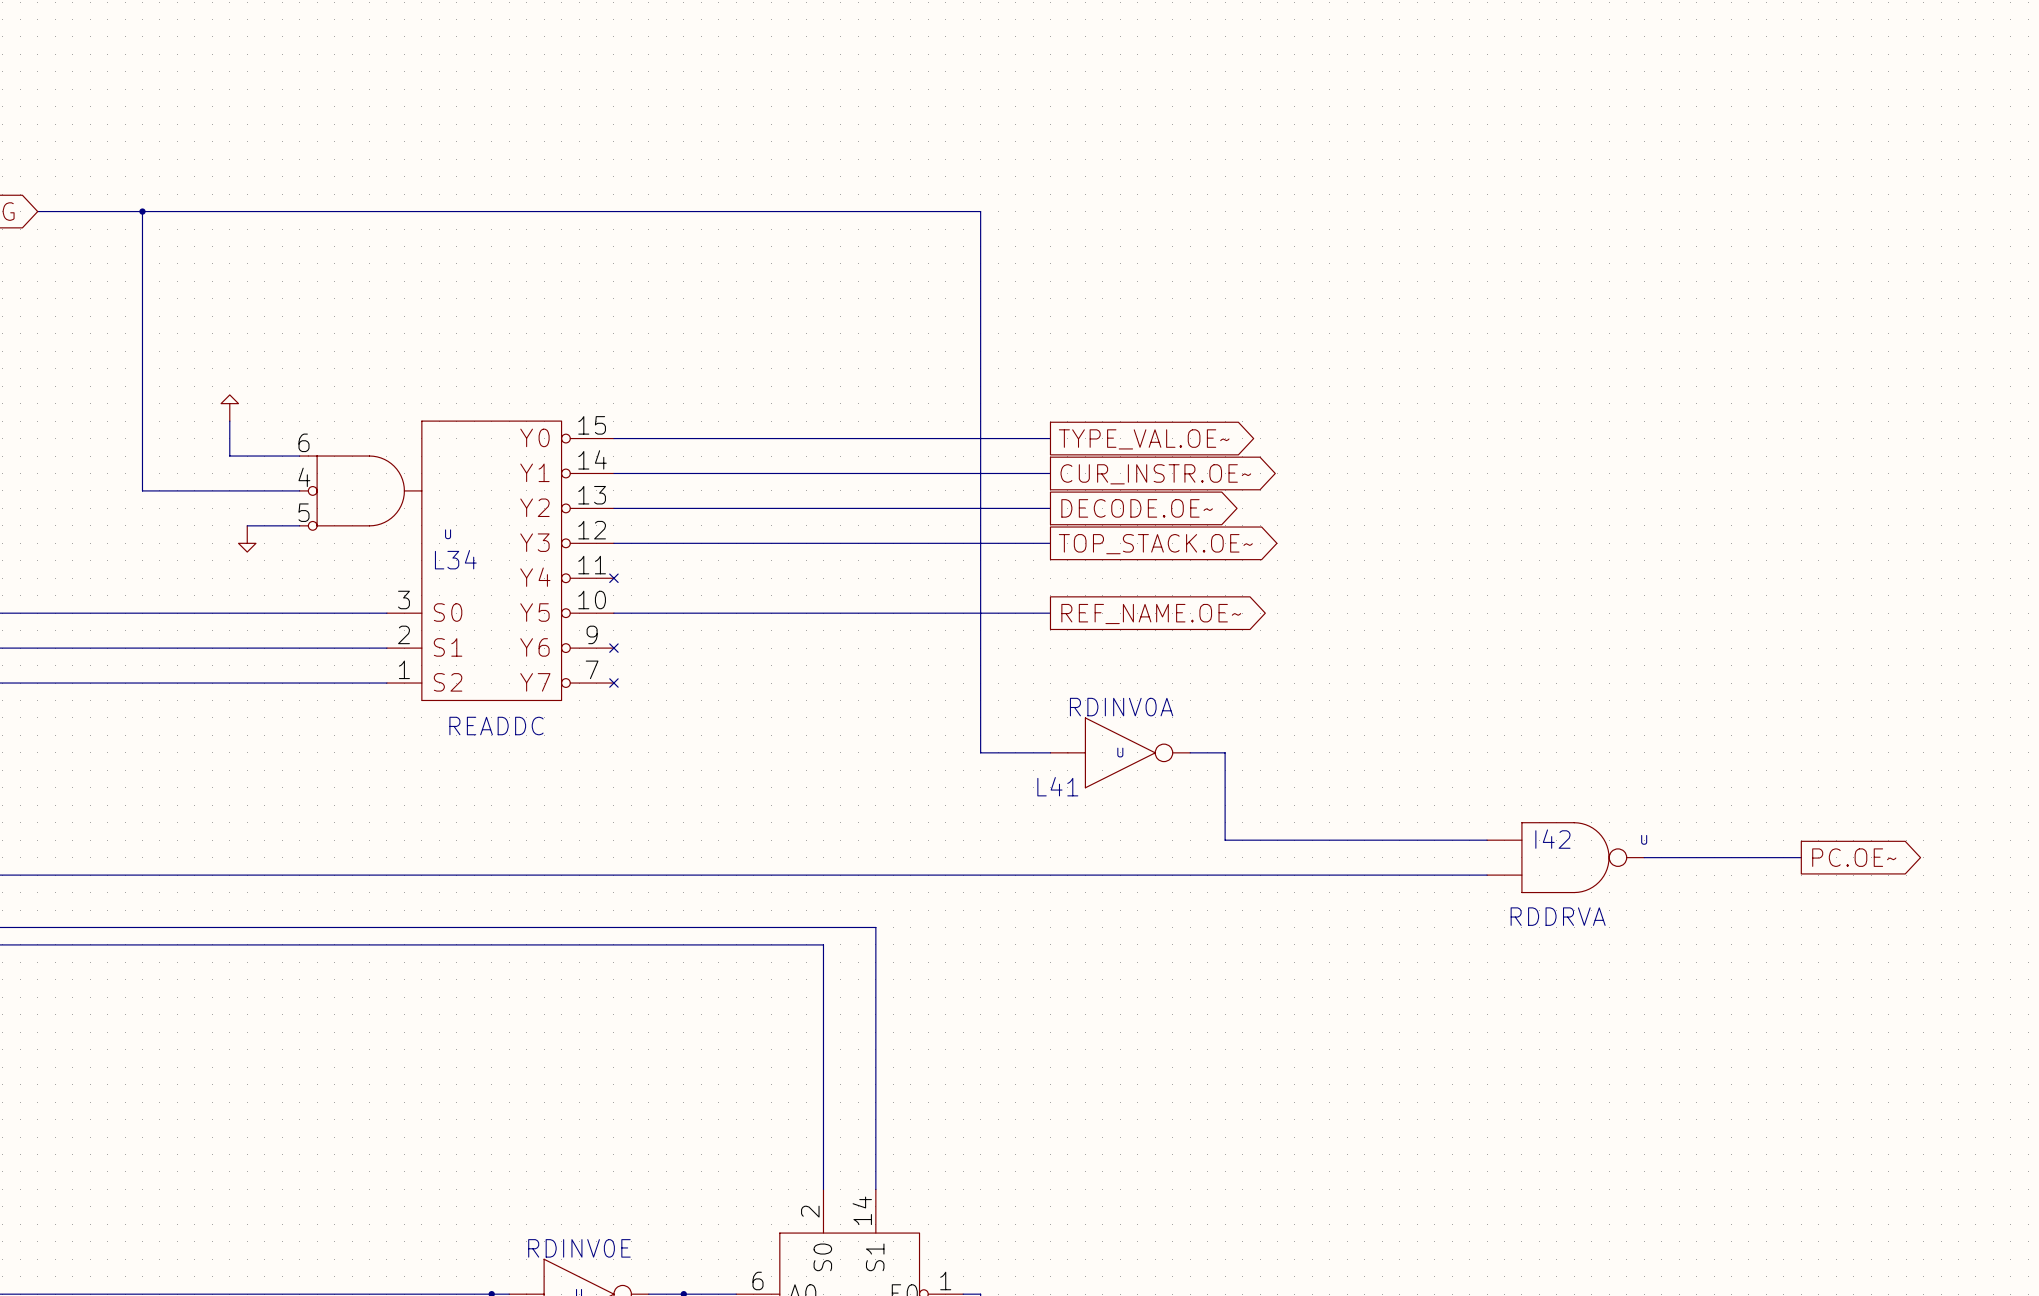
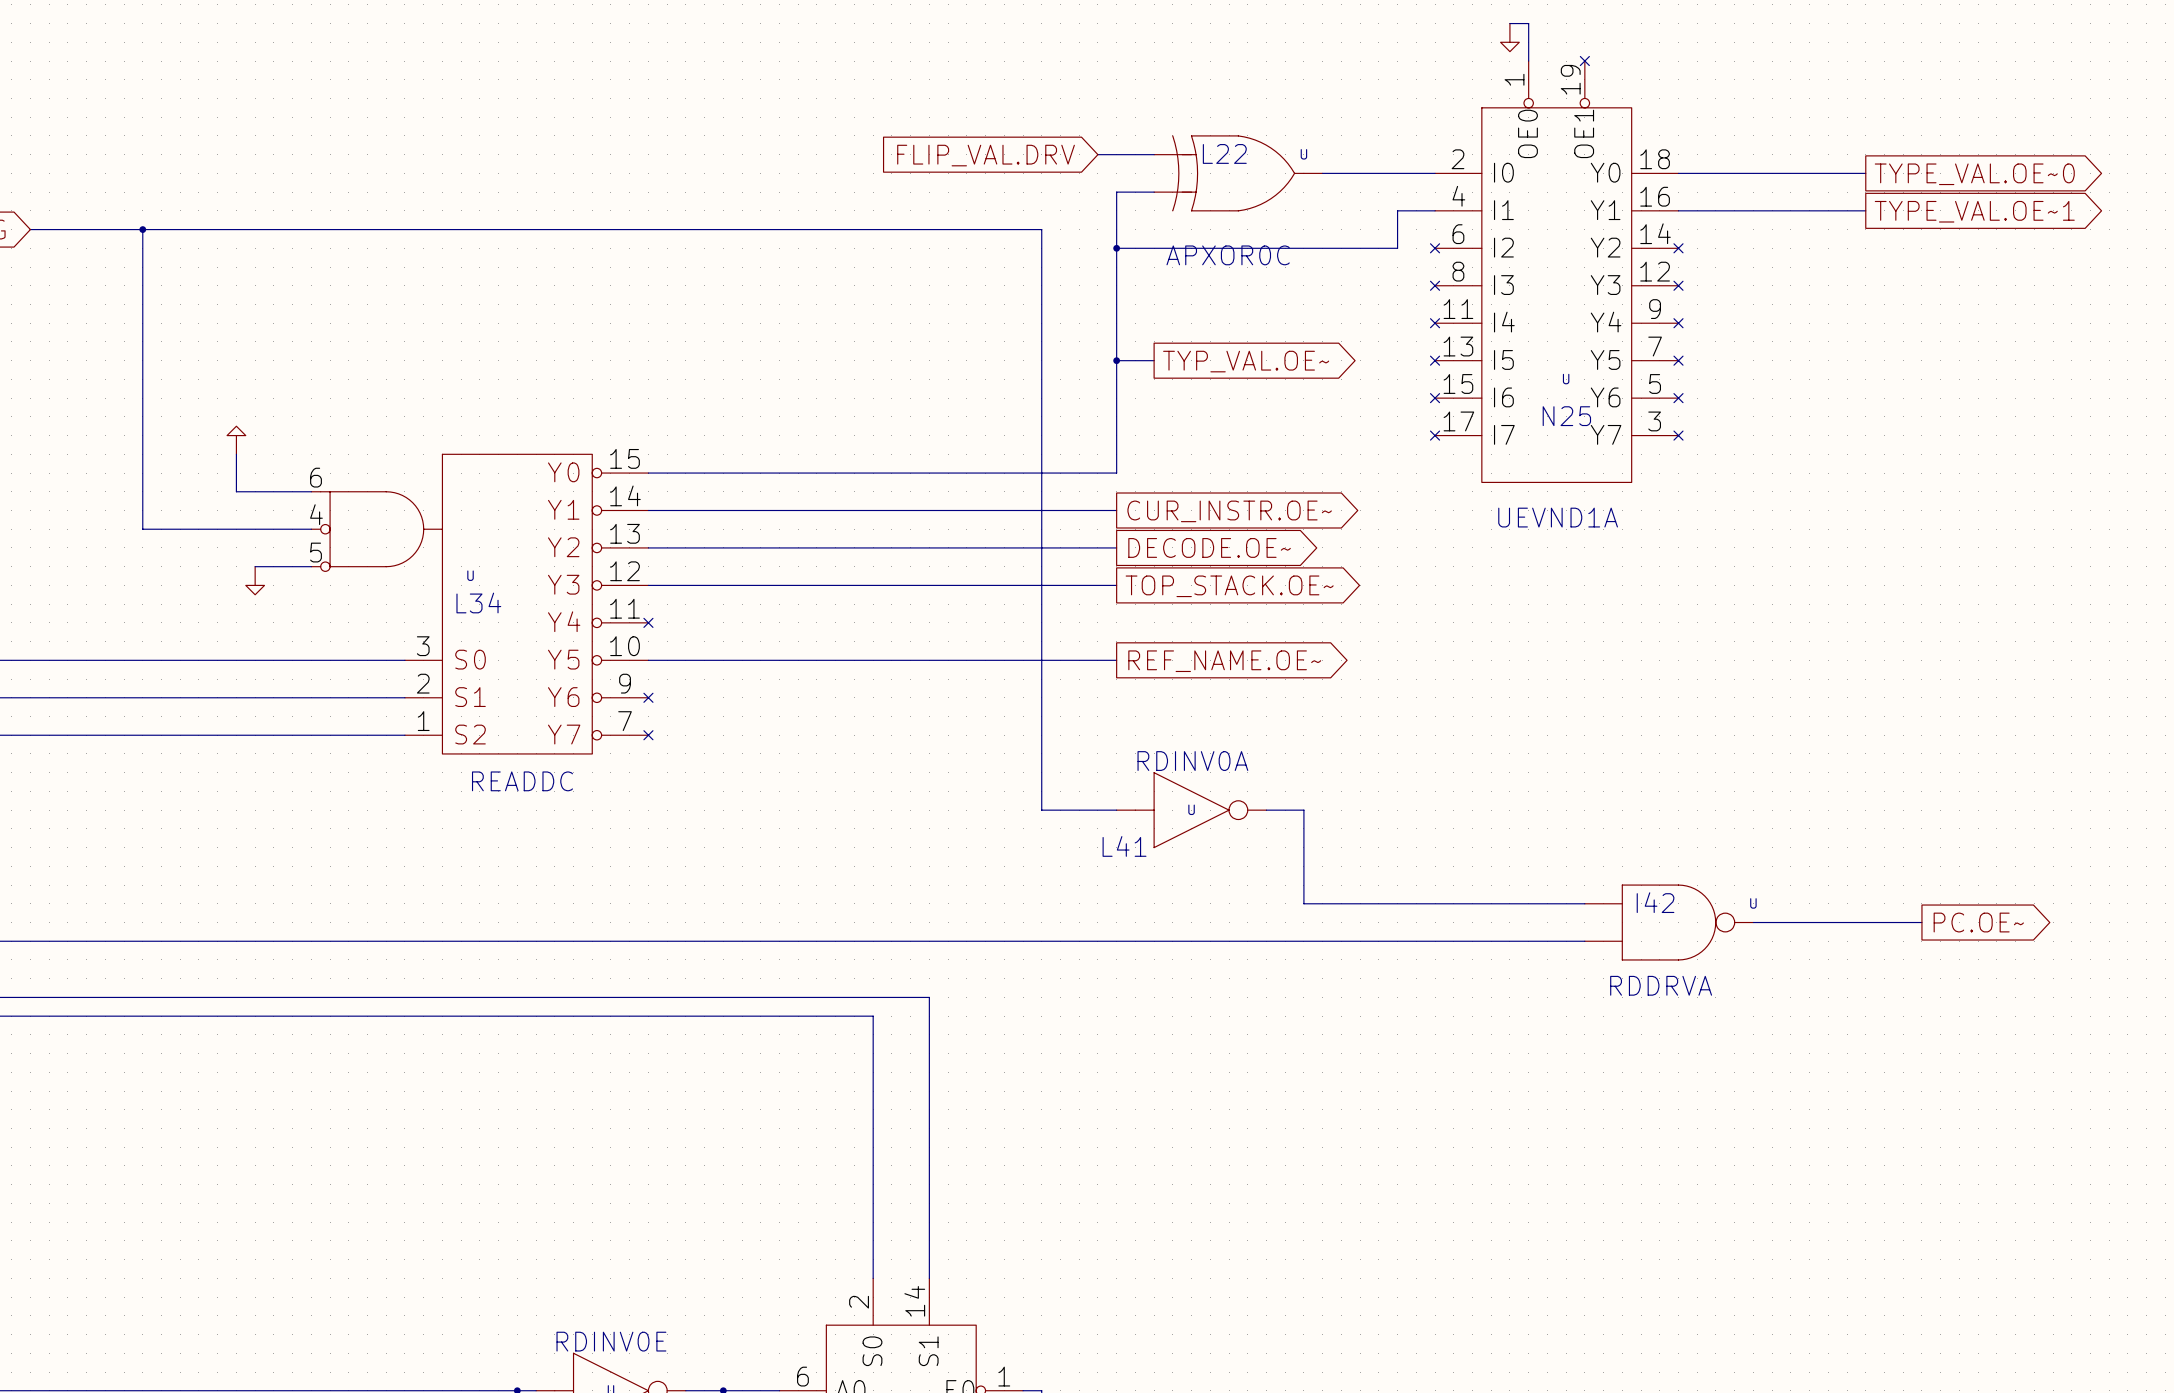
wire: none -> (1509, 23) (1528, 23) (1528, 61)
power symbol: none -> (1509, 37)
no-connect mark: none -> (1584, 61)
wire: none -> (1097, 154) (1154, 154)
global label: none -> FLIP_VAL.DRV (986, 155)
U: none -> (1238, 173)
wire: none -> (1322, 173) (1435, 173)
wire: none -> (1678, 173) (1865, 173)
global label: none -> TYPE_VAL.OE~0 (1974, 174)
wire: none -> (1154, 192) (1116, 192) (1116, 473)
wire: none -> (1435, 210) (1397, 210) (1397, 248) (1116, 248)
wire: none -> (1678, 210) (1865, 210)
global label: none -> TYPE_VAL.OE~1 (1974, 211)
junction: none -> (1116, 248)
no-connect mark: none -> (1435, 248)
no-connect mark: none -> (1678, 248)
U: none -> (1556, 271)
no-connect mark: none -> (1435, 285)
no-connect mark: none -> (1678, 285)
no-connect mark: none -> (1435, 323)
no-connect mark: none -> (1678, 323)
wire: none -> (1116, 360) (1154, 360)
junction: none -> (1116, 360)
no-connect mark: none -> (1435, 360)
no-connect mark: none -> (1678, 360)
global label: none -> TYP_VAL.OE~ (1246, 361)
no-connect mark: none -> (1435, 398)
no-connect mark: none -> (1678, 398)
no-connect mark: none -> (1435, 435)
no-connect mark: none -> (1678, 435)
global label: TYPE_VAL.OE~ (1144, 439) -> none

